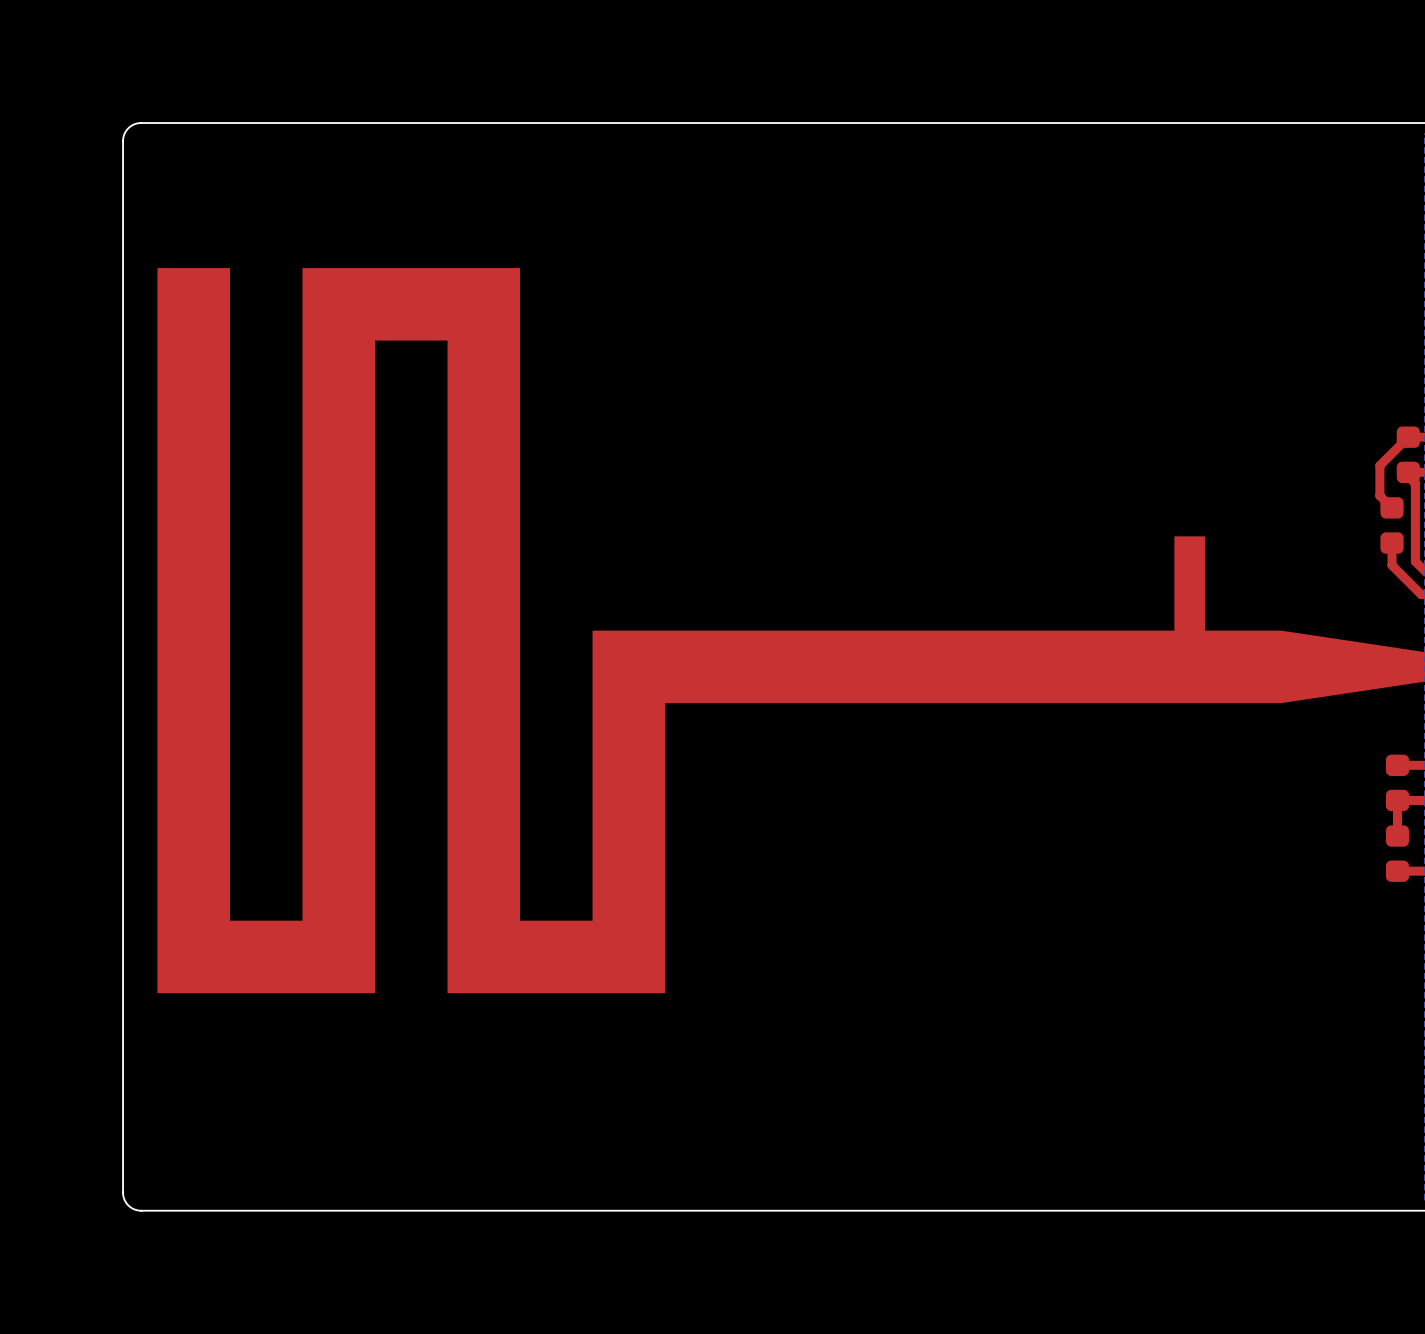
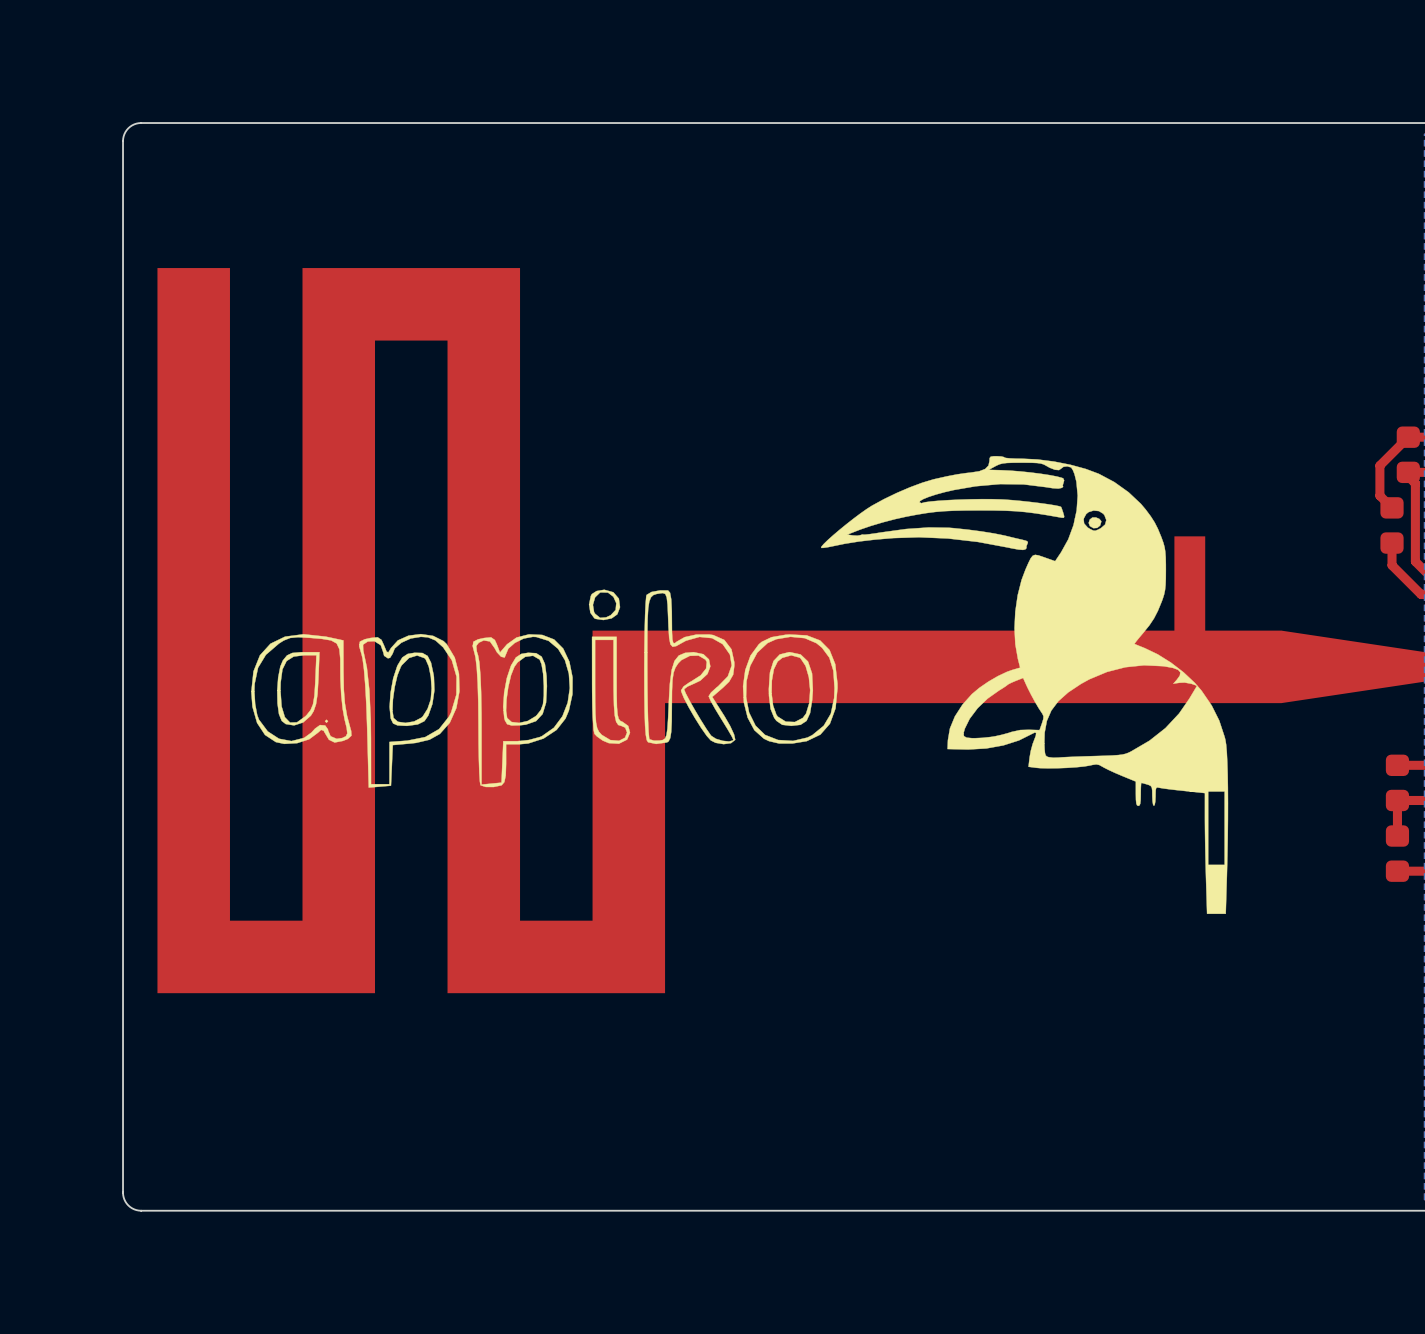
drawing: none -> [251, 456, 1229, 914]

